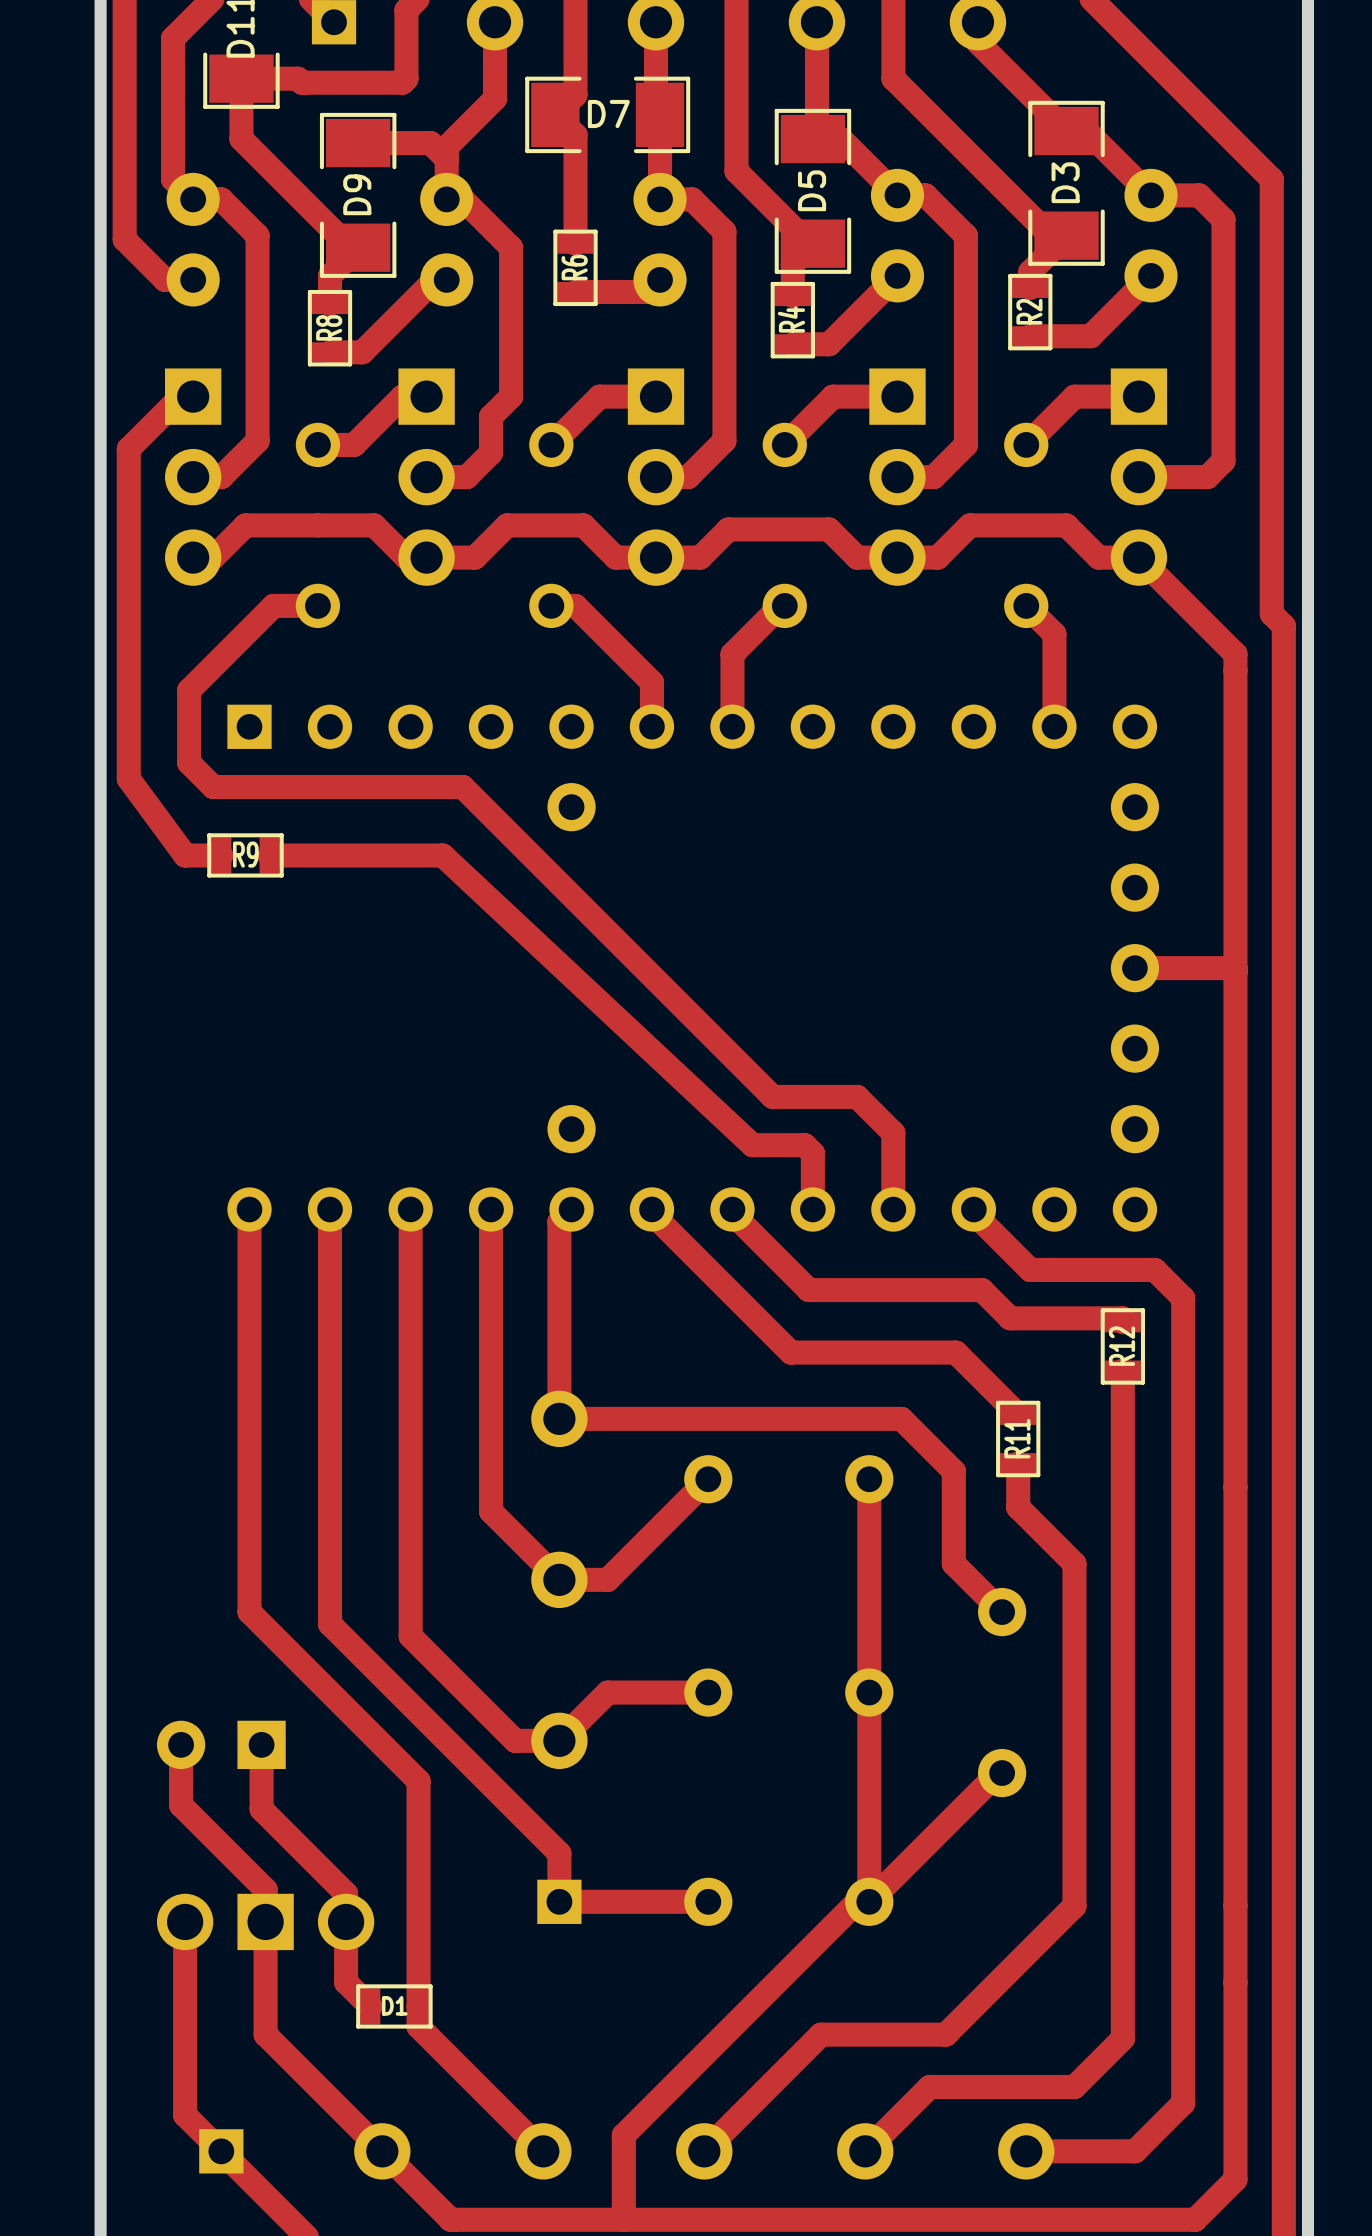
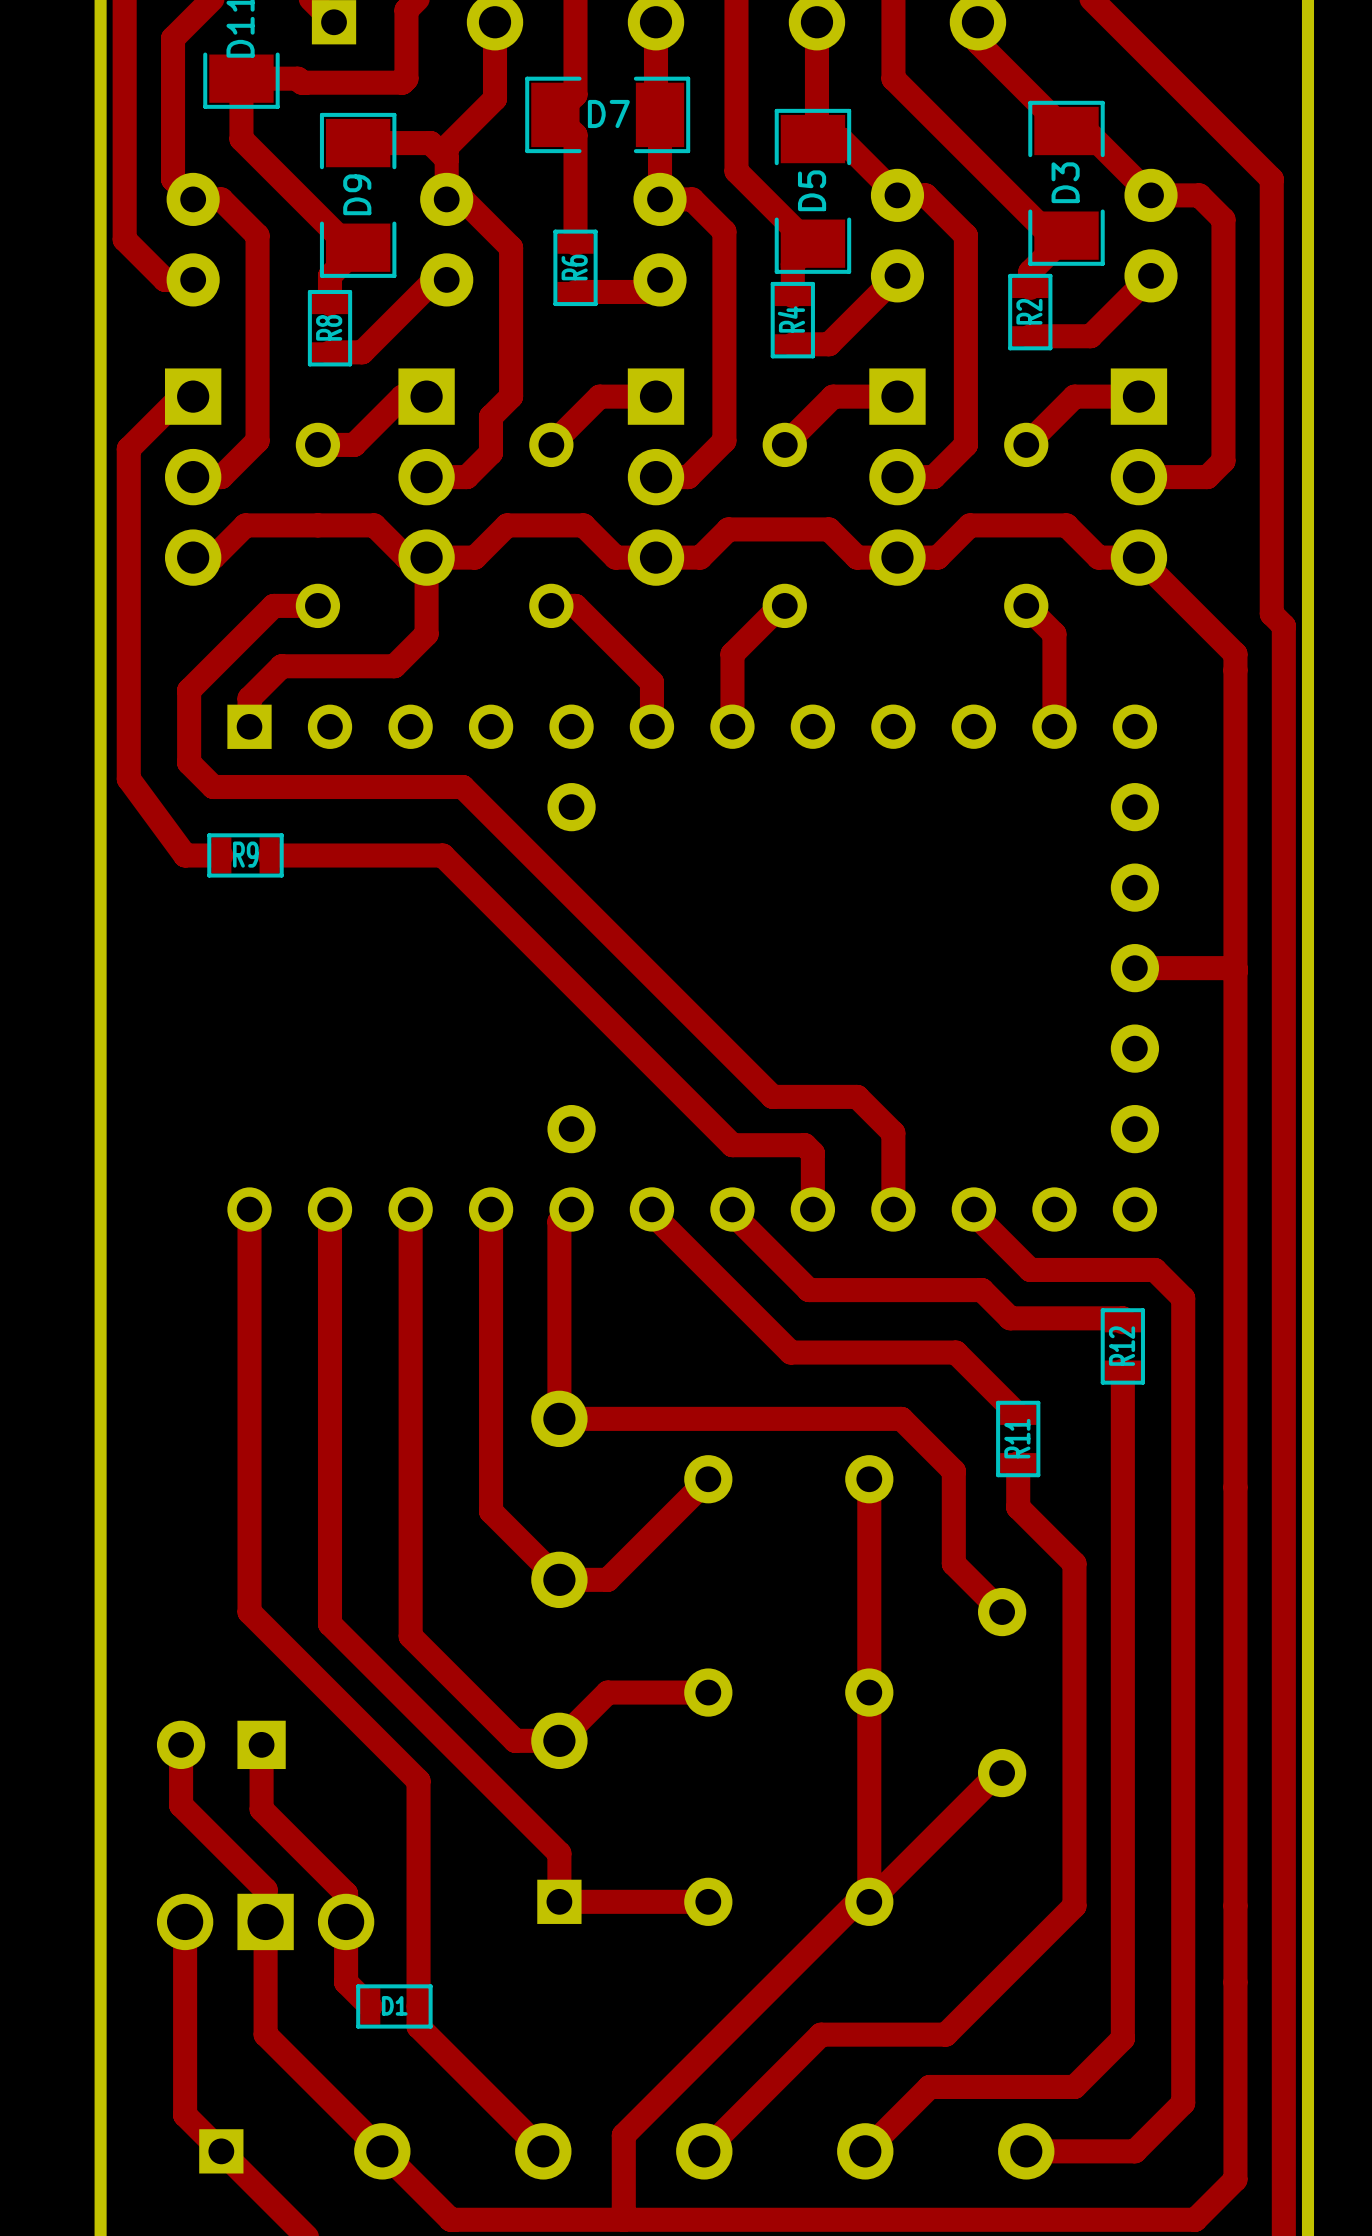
top track: none -> (426, 557) (426, 634) (394, 666) (281, 666) (249, 698) (249, 726)
top track: (442, 855) (752, 1145) -> (442, 855) (732, 1145) (752, 1145)

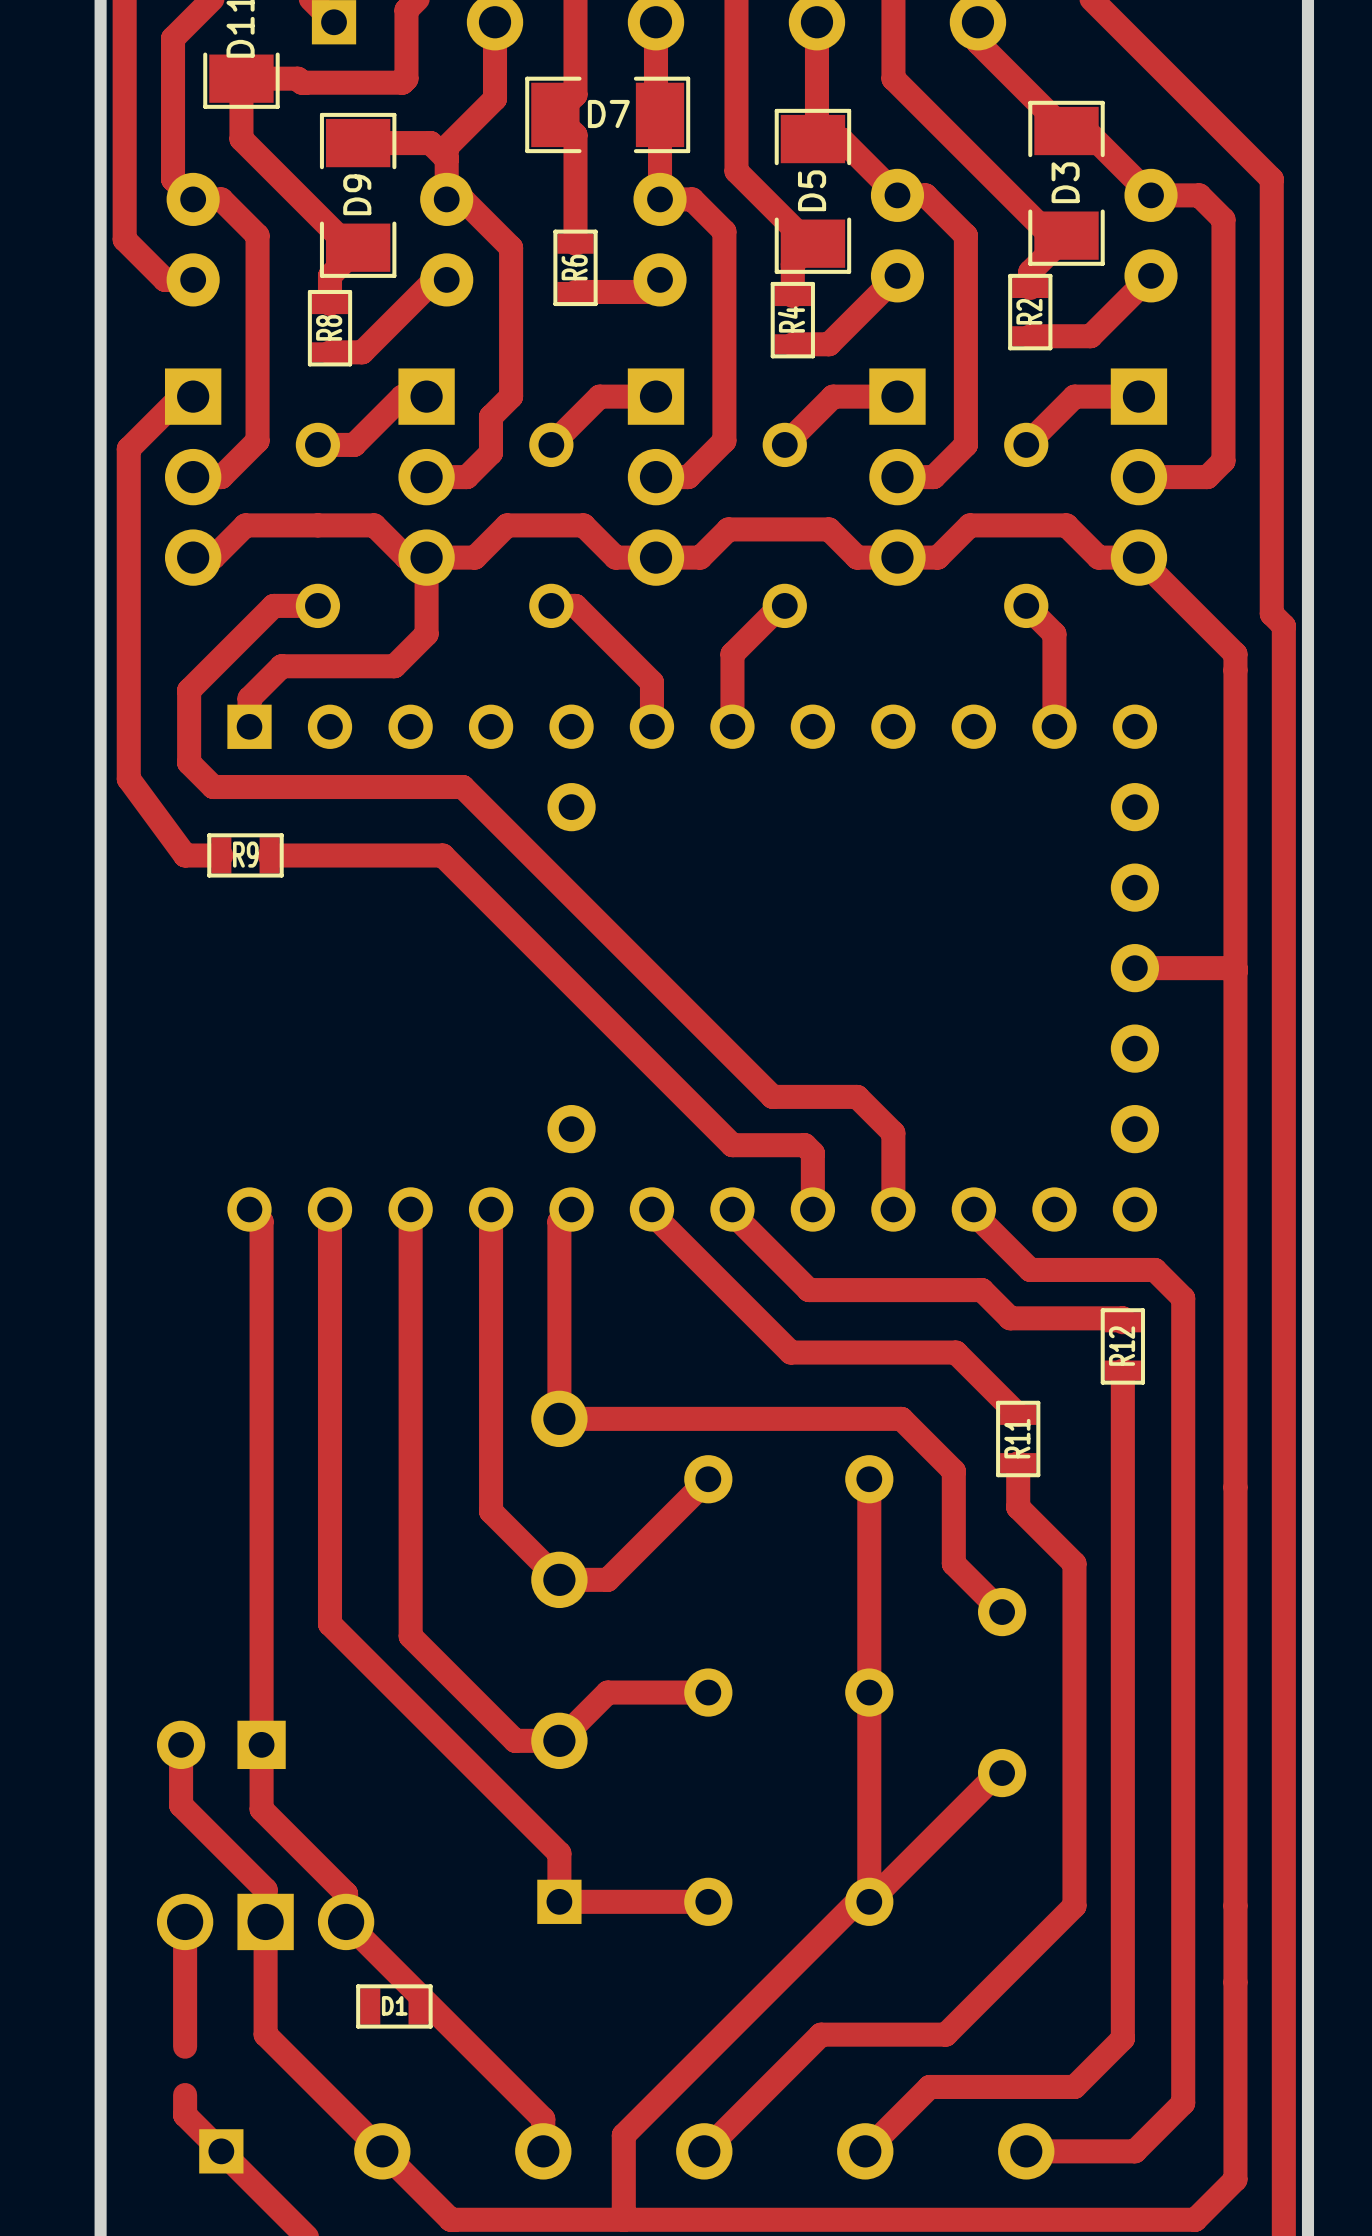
top track: (249, 1209) (249, 1612) (418, 1781) (418, 2026) (543, 2151) -> (249, 1209) (261, 1221) (261, 1744)
top track: (346, 1921) (346, 1982) (370, 2006) -> (346, 1921) (543, 2119) (543, 2151)
top track: (185, 2046) (185, 2095) -> none

